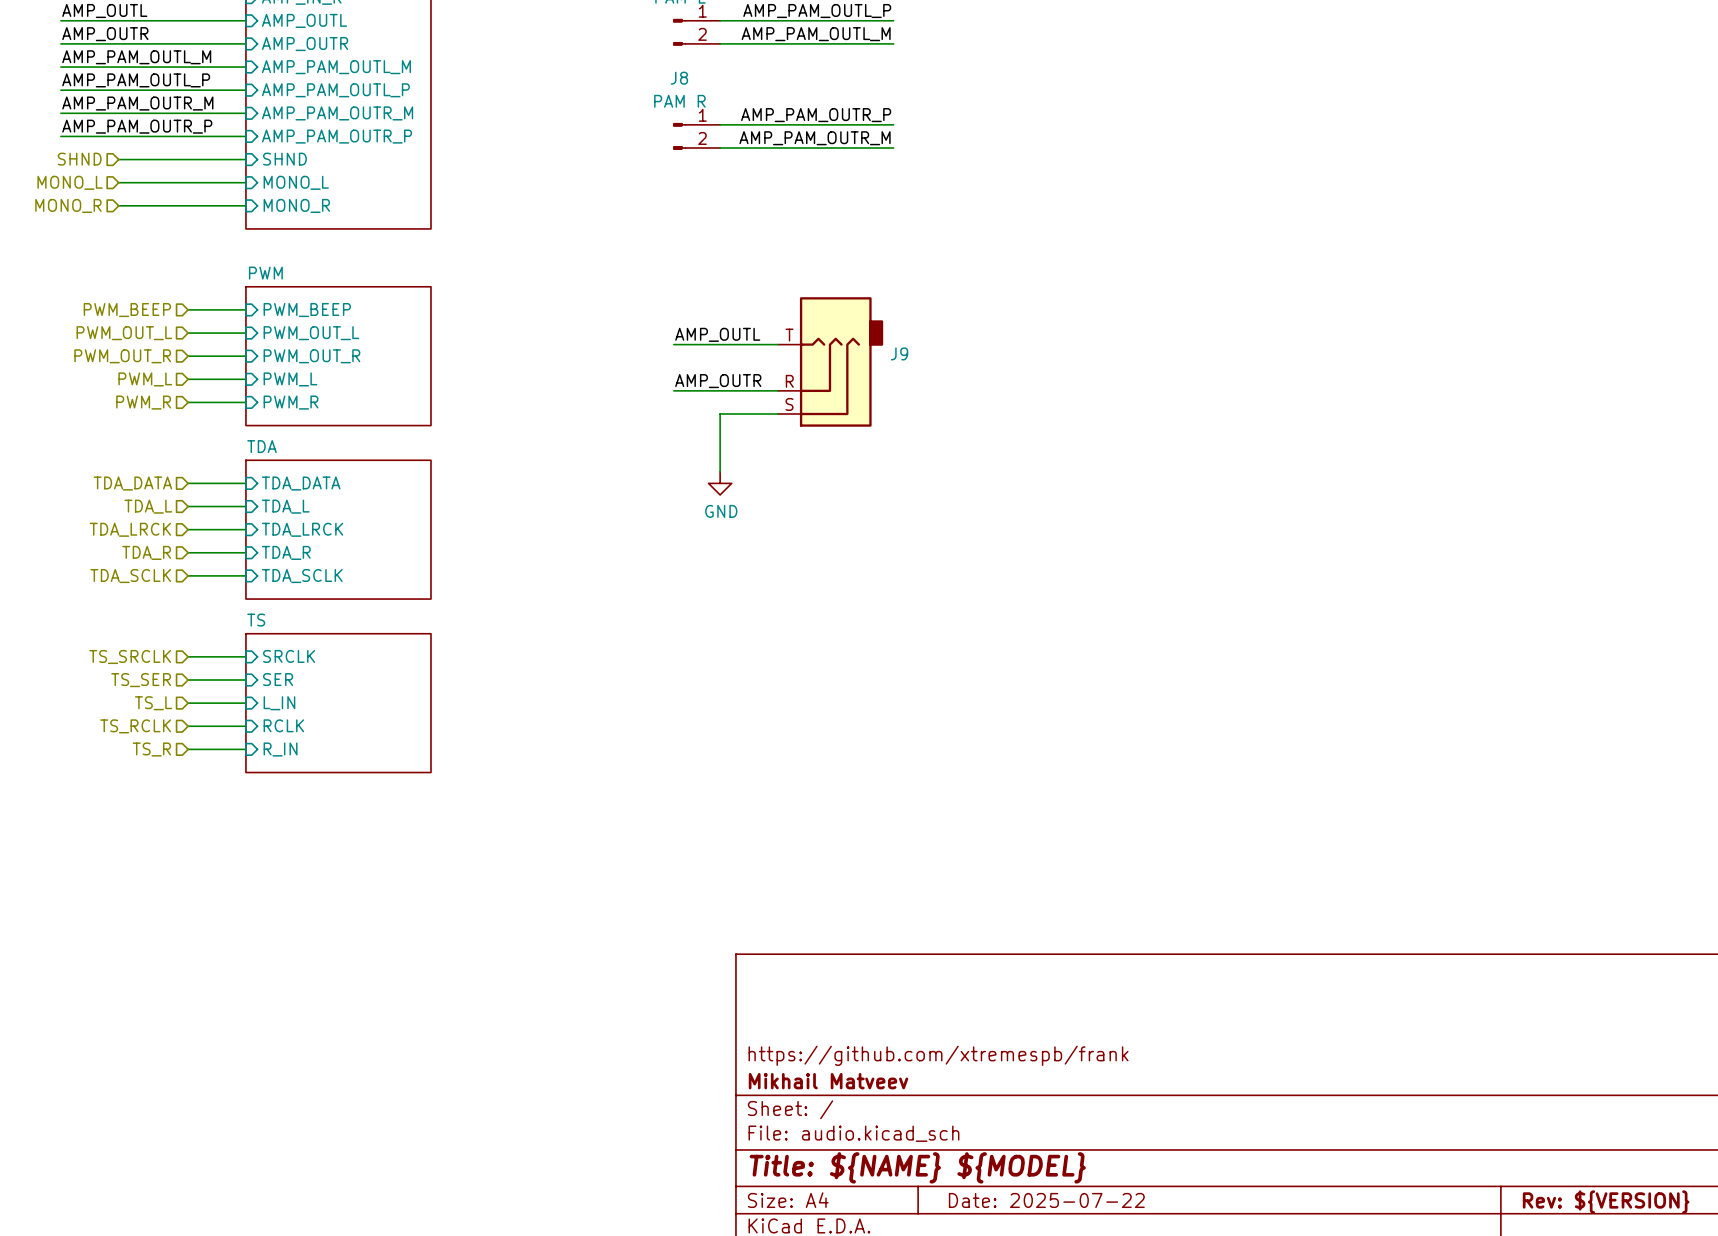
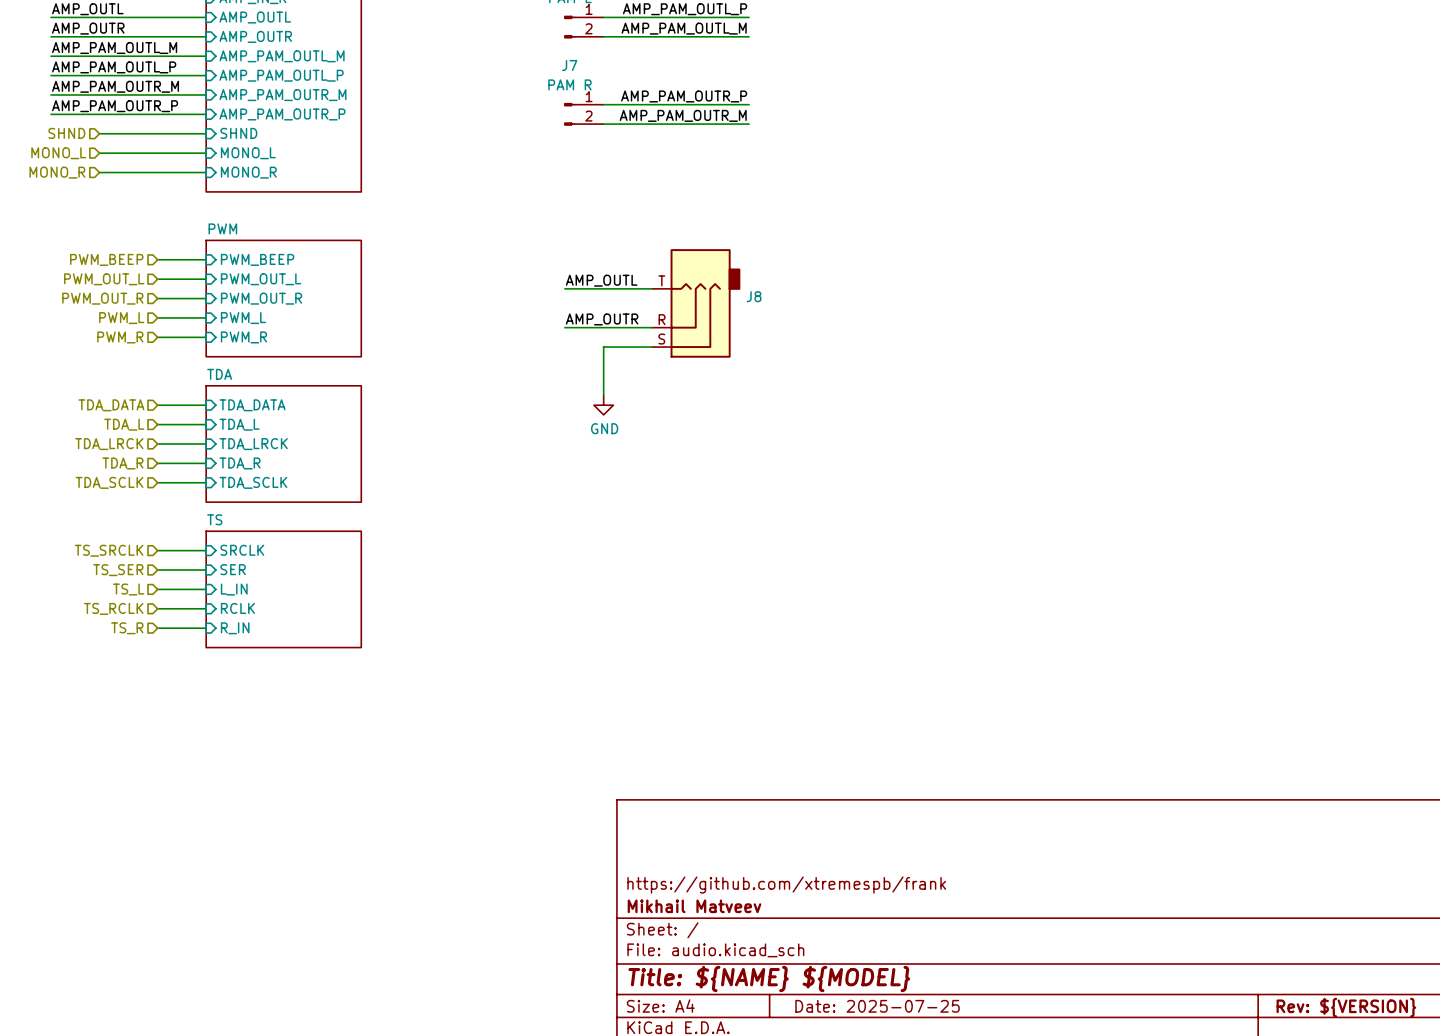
J8 name: J8 (679, 78) -> J7 (569, 65)
J9 name: J9 (899, 353) -> J8 (754, 296)
title block: Date: 2025-07-22 (1046, 1200) -> Date: 2025-07-25 (877, 1006)

